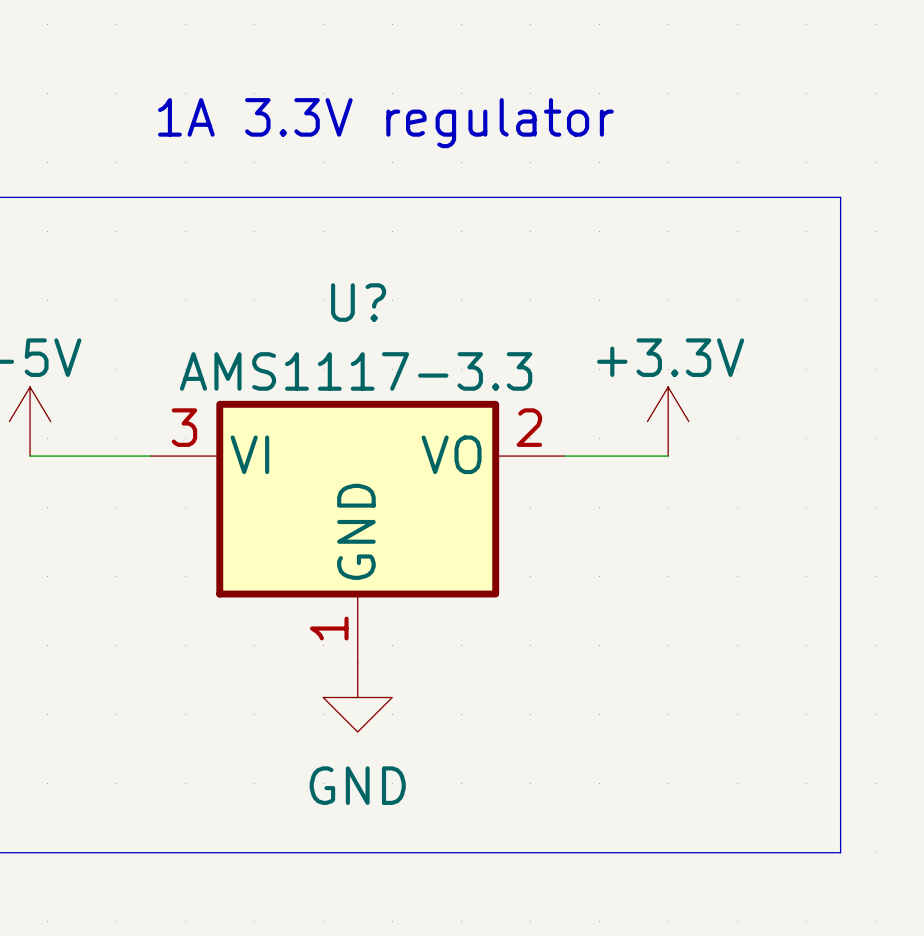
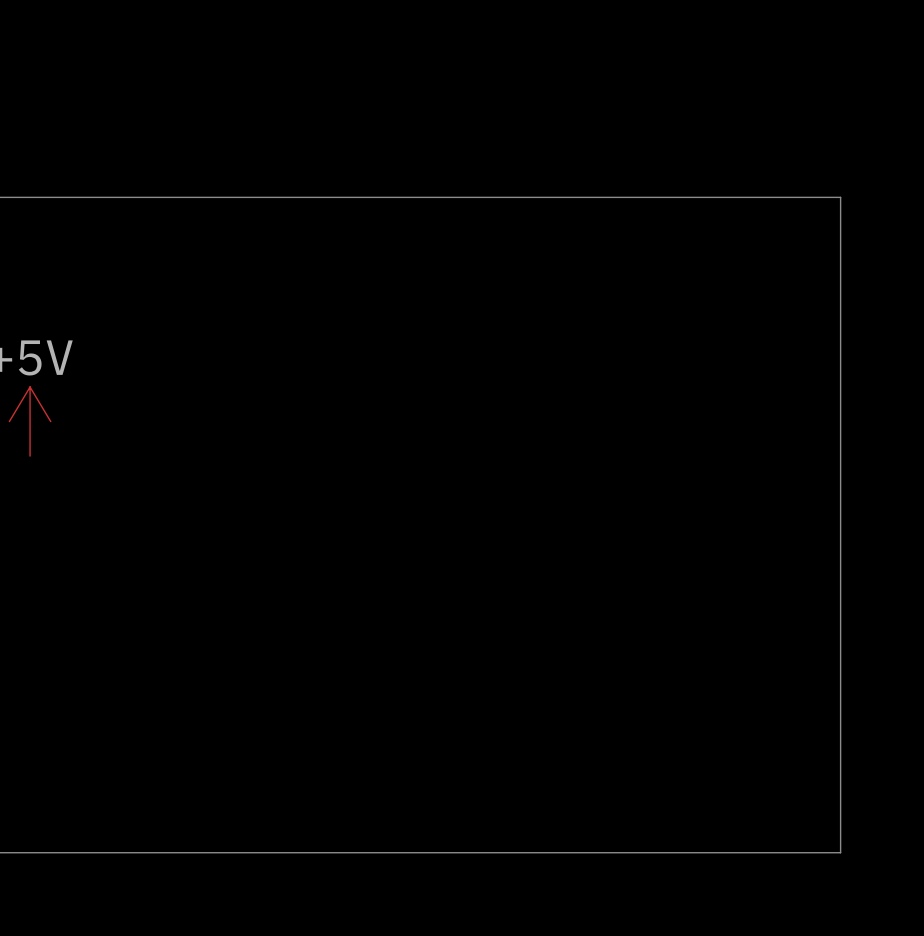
text: 1A 3.3V regulator (385, 123) -> none
power symbol: +3.3V (668, 421) -> none
wire: (30, 456) (150, 456) -> none
wire: (564, 456) (668, 456) -> none
U?: AMS1117-3.3 (357, 531) -> none
power symbol: GND (357, 697) -> none

